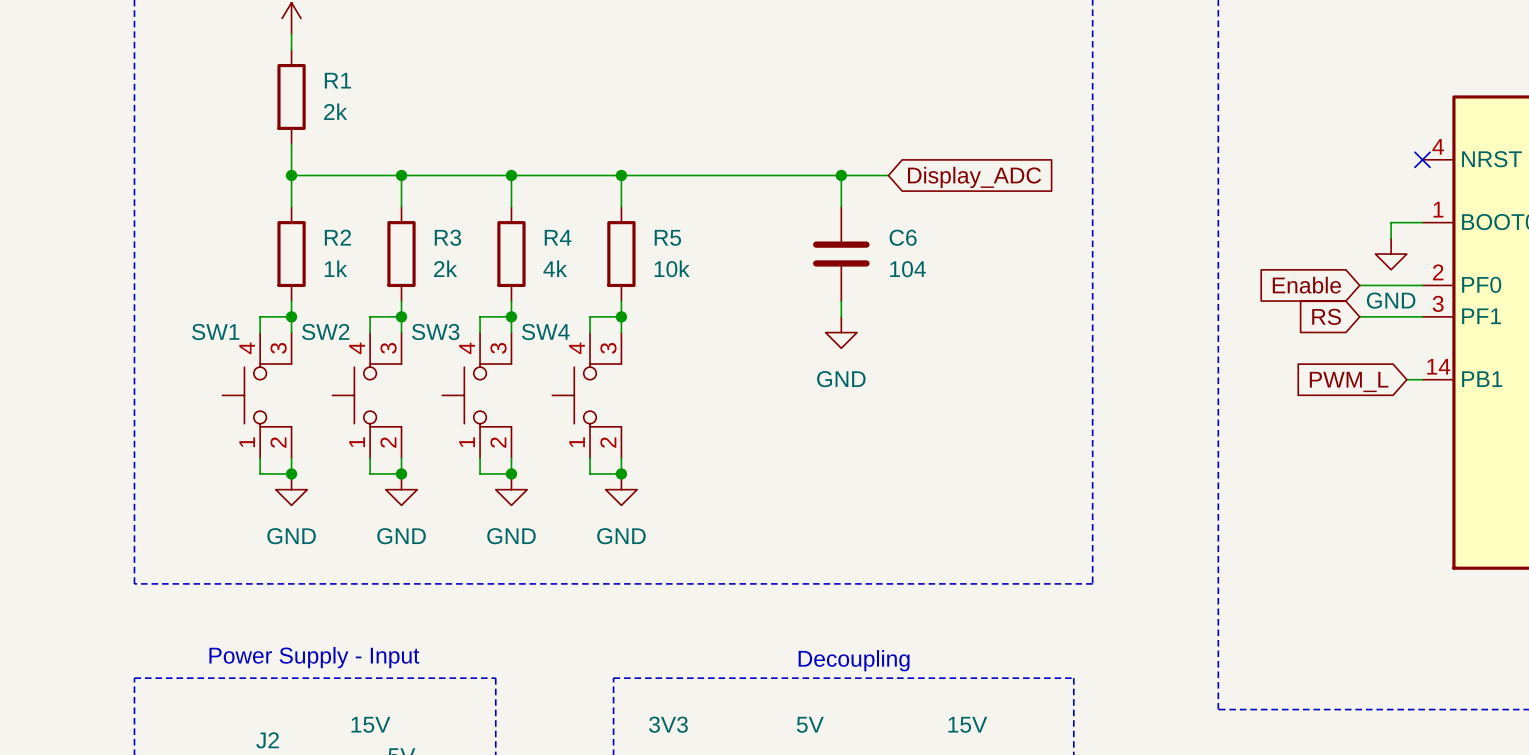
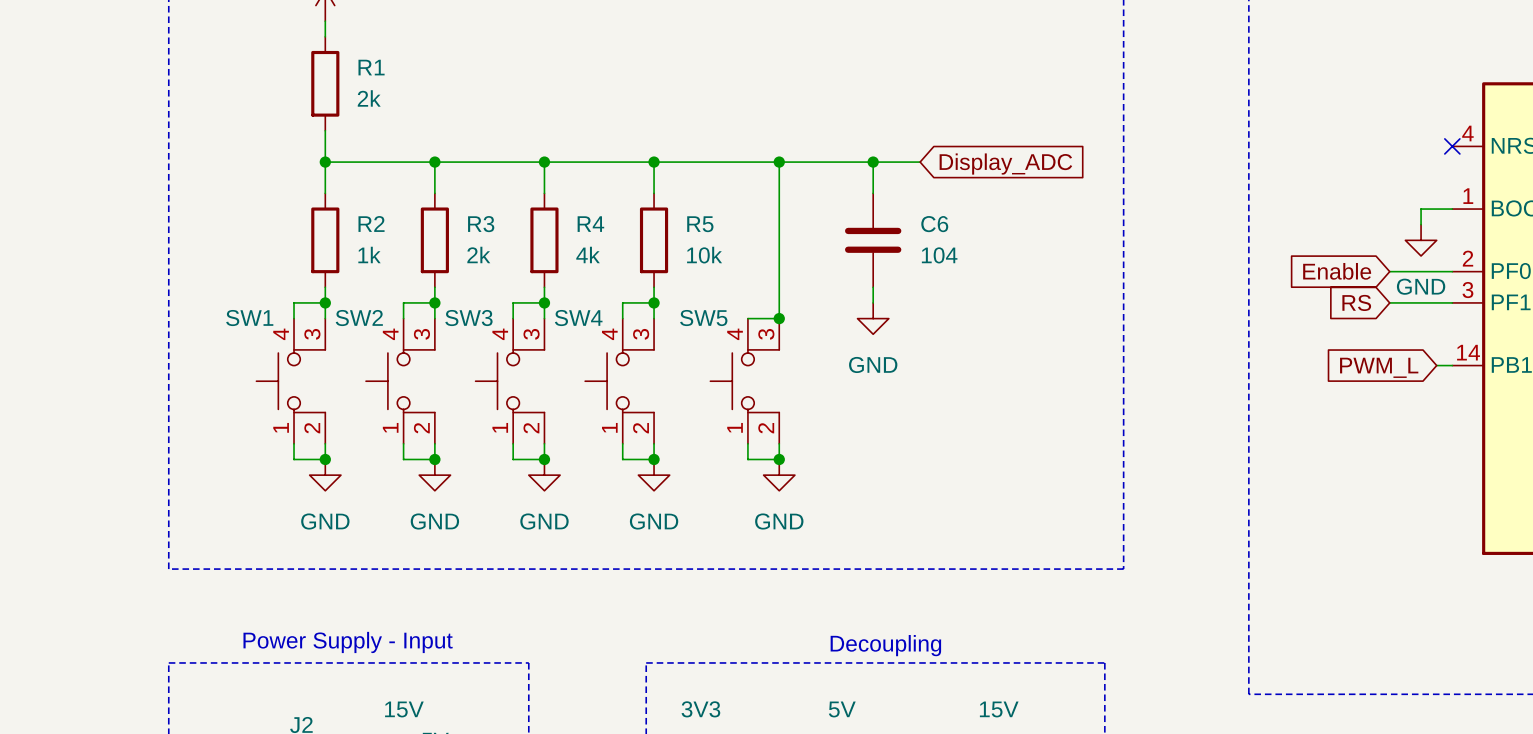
wire: none -> (779, 162) (779, 318) (747, 318)
junction: none -> (779, 162)
junction: none -> (779, 318)
SW5: none -> (744, 381)
wire: none -> (747, 443) (747, 459) (779, 459) (779, 443)
junction: none -> (779, 459)
power symbol: none -> GND (779, 475)

